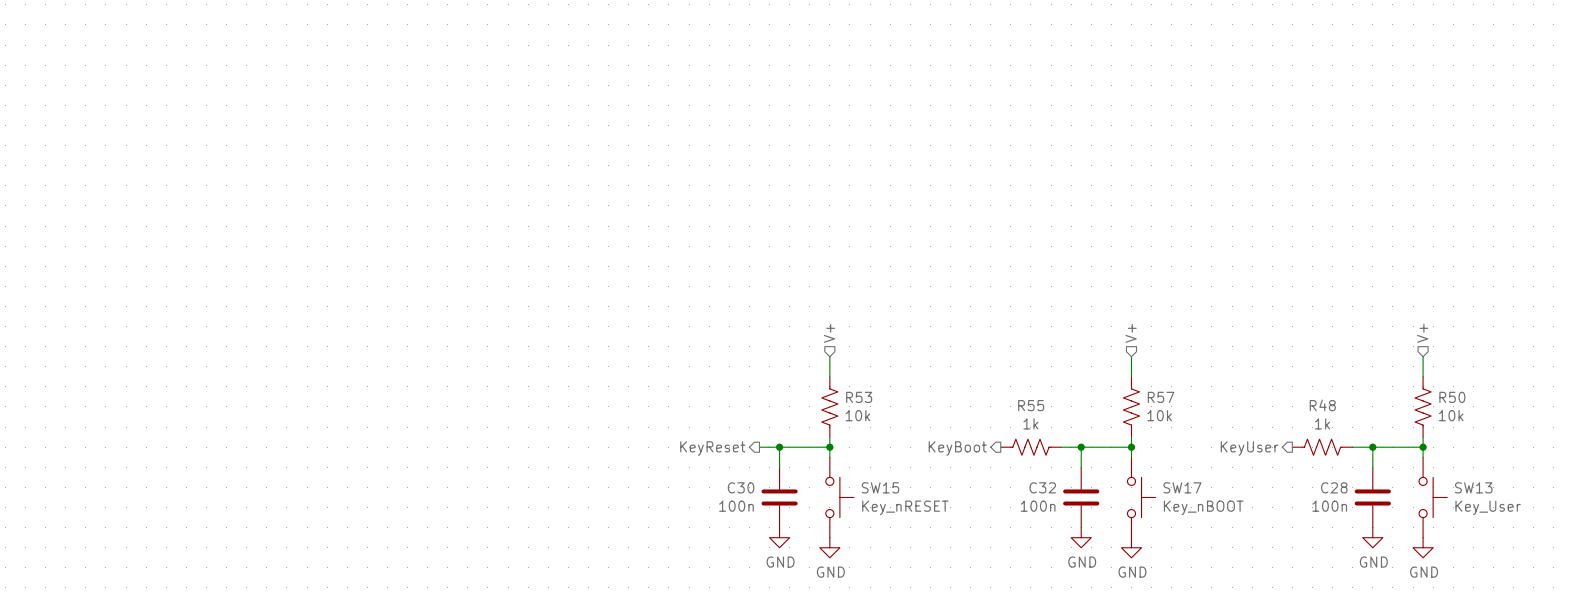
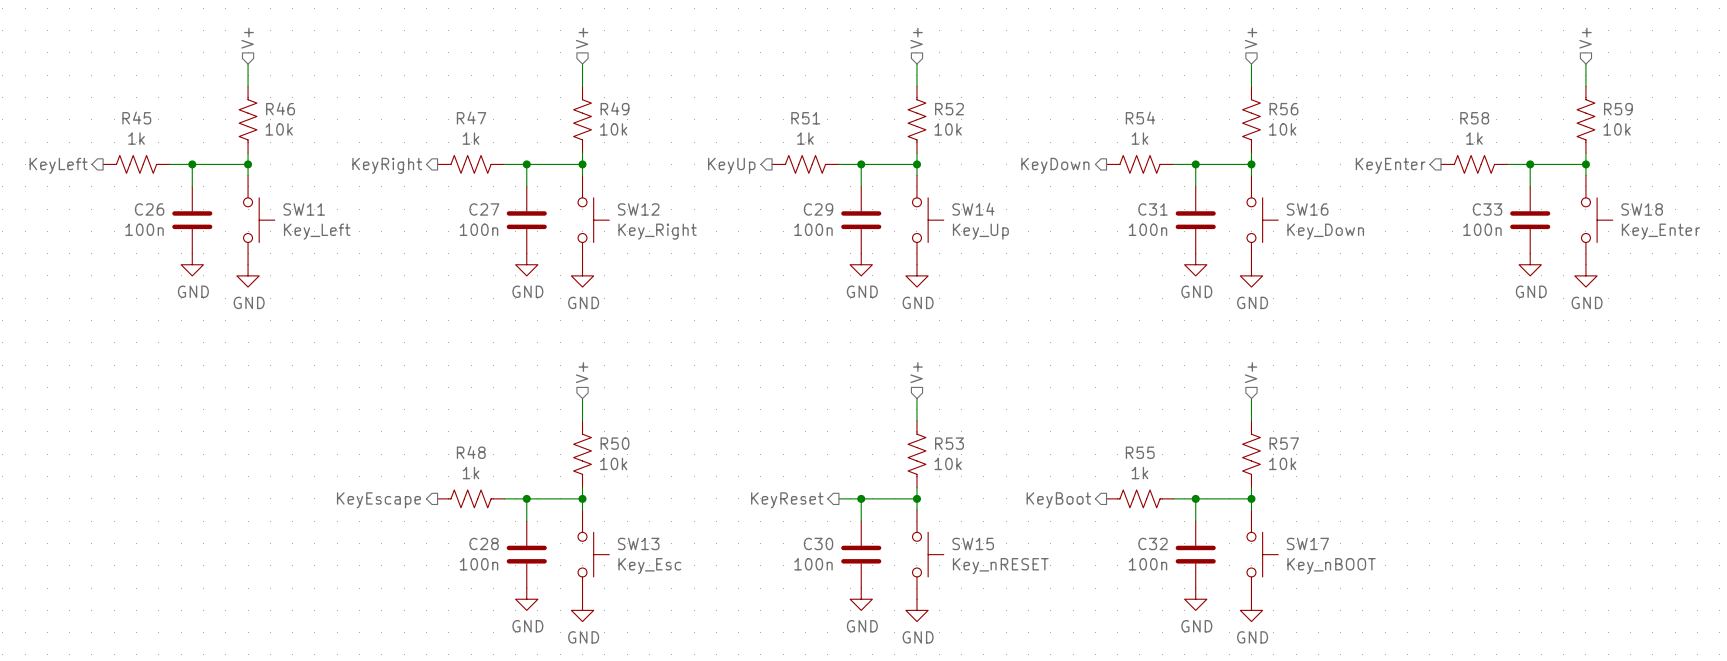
hierarchical label: none -> V+ (247, 38)
hierarchical label: none -> V+ (582, 38)
hierarchical label: none -> V+ (916, 38)
hierarchical label: none -> V+ (1251, 38)
hierarchical label: none -> V+ (1585, 38)
wire: none -> (248, 64) (248, 86)
wire: none -> (582, 64) (582, 86)
wire: none -> (916, 64) (916, 86)
wire: none -> (1251, 64) (1251, 86)
wire: none -> (1585, 64) (1585, 86)
R46: none -> 10k (248, 119)
R49: none -> 10k (582, 119)
R52: none -> 10k (916, 119)
R56: none -> 10k (1251, 119)
R59: none -> 10k (1585, 119)
wire: none -> (248, 153) (248, 175)
wire: none -> (582, 153) (582, 175)
wire: none -> (916, 153) (916, 175)
wire: none -> (1251, 153) (1251, 175)
wire: none -> (1585, 153) (1585, 175)
R45: none -> 1k (136, 164)
wire: none -> (169, 164) (248, 164)
wire: none -> (192, 164) (192, 186)
junction: none -> (192, 164)
junction: none -> (248, 164)
R47: none -> 1k (471, 164)
wire: none -> (504, 164) (582, 164)
wire: none -> (526, 164) (526, 186)
junction: none -> (526, 164)
junction: none -> (582, 164)
R51: none -> 1k (805, 164)
wire: none -> (838, 164) (916, 164)
wire: none -> (861, 164) (861, 186)
junction: none -> (861, 164)
junction: none -> (916, 164)
R54: none -> 1k (1139, 164)
wire: none -> (1173, 164) (1251, 164)
wire: none -> (1195, 164) (1195, 186)
junction: none -> (1195, 164)
junction: none -> (1251, 164)
R58: none -> 1k (1474, 164)
wire: none -> (1507, 164) (1585, 164)
wire: none -> (1530, 164) (1530, 186)
junction: none -> (1530, 164)
junction: none -> (1585, 164)
hierarchical label: none -> KeyLeft (58, 165)
hierarchical label: none -> KeyRight (387, 165)
hierarchical label: none -> KeyUp (731, 165)
hierarchical label: none -> KeyDown (1055, 165)
hierarchical label: none -> KeyEnter (1390, 165)
C26: none -> 100n (192, 220)
SW11: none -> Key_Left (259, 220)
C27: none -> 100n (526, 220)
SW12: none -> Key_Right (593, 220)
C29: none -> 100n (861, 220)
SW14: none -> Key_Up (928, 220)
C31: none -> 100n (1195, 220)
SW16: none -> Key_Down (1262, 220)
C33: none -> 100n (1530, 220)
SW18: none -> Key_Enter (1597, 220)
power symbol: none -> GND (192, 264)
power symbol: none -> GND (526, 264)
power symbol: none -> GND (861, 264)
power symbol: none -> GND (1195, 264)
power symbol: none -> GND (1530, 264)
power symbol: none -> GND (248, 275)
power symbol: none -> GND (582, 275)
power symbol: none -> GND (916, 275)
power symbol: none -> GND (1251, 275)
power symbol: none -> GND (1585, 275)
hierarchical label: none -> V+ (582, 372)
hierarchical label: V+ (1422, 333) -> none
wire: none -> (582, 398) (582, 420)
wire: (1423, 356) (1423, 376) -> none
R50 position: (1423, 406) -> (582, 454)
wire: none -> (582, 487) (582, 510)
wire: (1423, 437) (1423, 457) -> none
wire: none -> (504, 498) (582, 498)
wire: none -> (526, 498) (526, 521)
junction: none -> (526, 498)
junction: none -> (582, 498)
R48 position: (1322, 447) -> (471, 498)
wire: (1352, 447) (1423, 447) -> none
wire: (1372, 447) (1372, 467) -> none
junction: (1372, 447) -> none
junction: (1423, 447) -> none
hierarchical label: none -> KeyEscape (379, 500)
hierarchical label: KeyUser (1249, 448) -> none
C28 position: (1372, 497) -> (526, 554)
SW13 position: (1433, 497) -> (593, 554)
SW13 value: Key_User (1488, 507) -> Key_Esc (649, 566)
power symbol: none -> GND (526, 599)
power symbol: GND (1372, 537) -> none
power symbol: none -> GND (582, 610)
power symbol: GND (1423, 547) -> none

